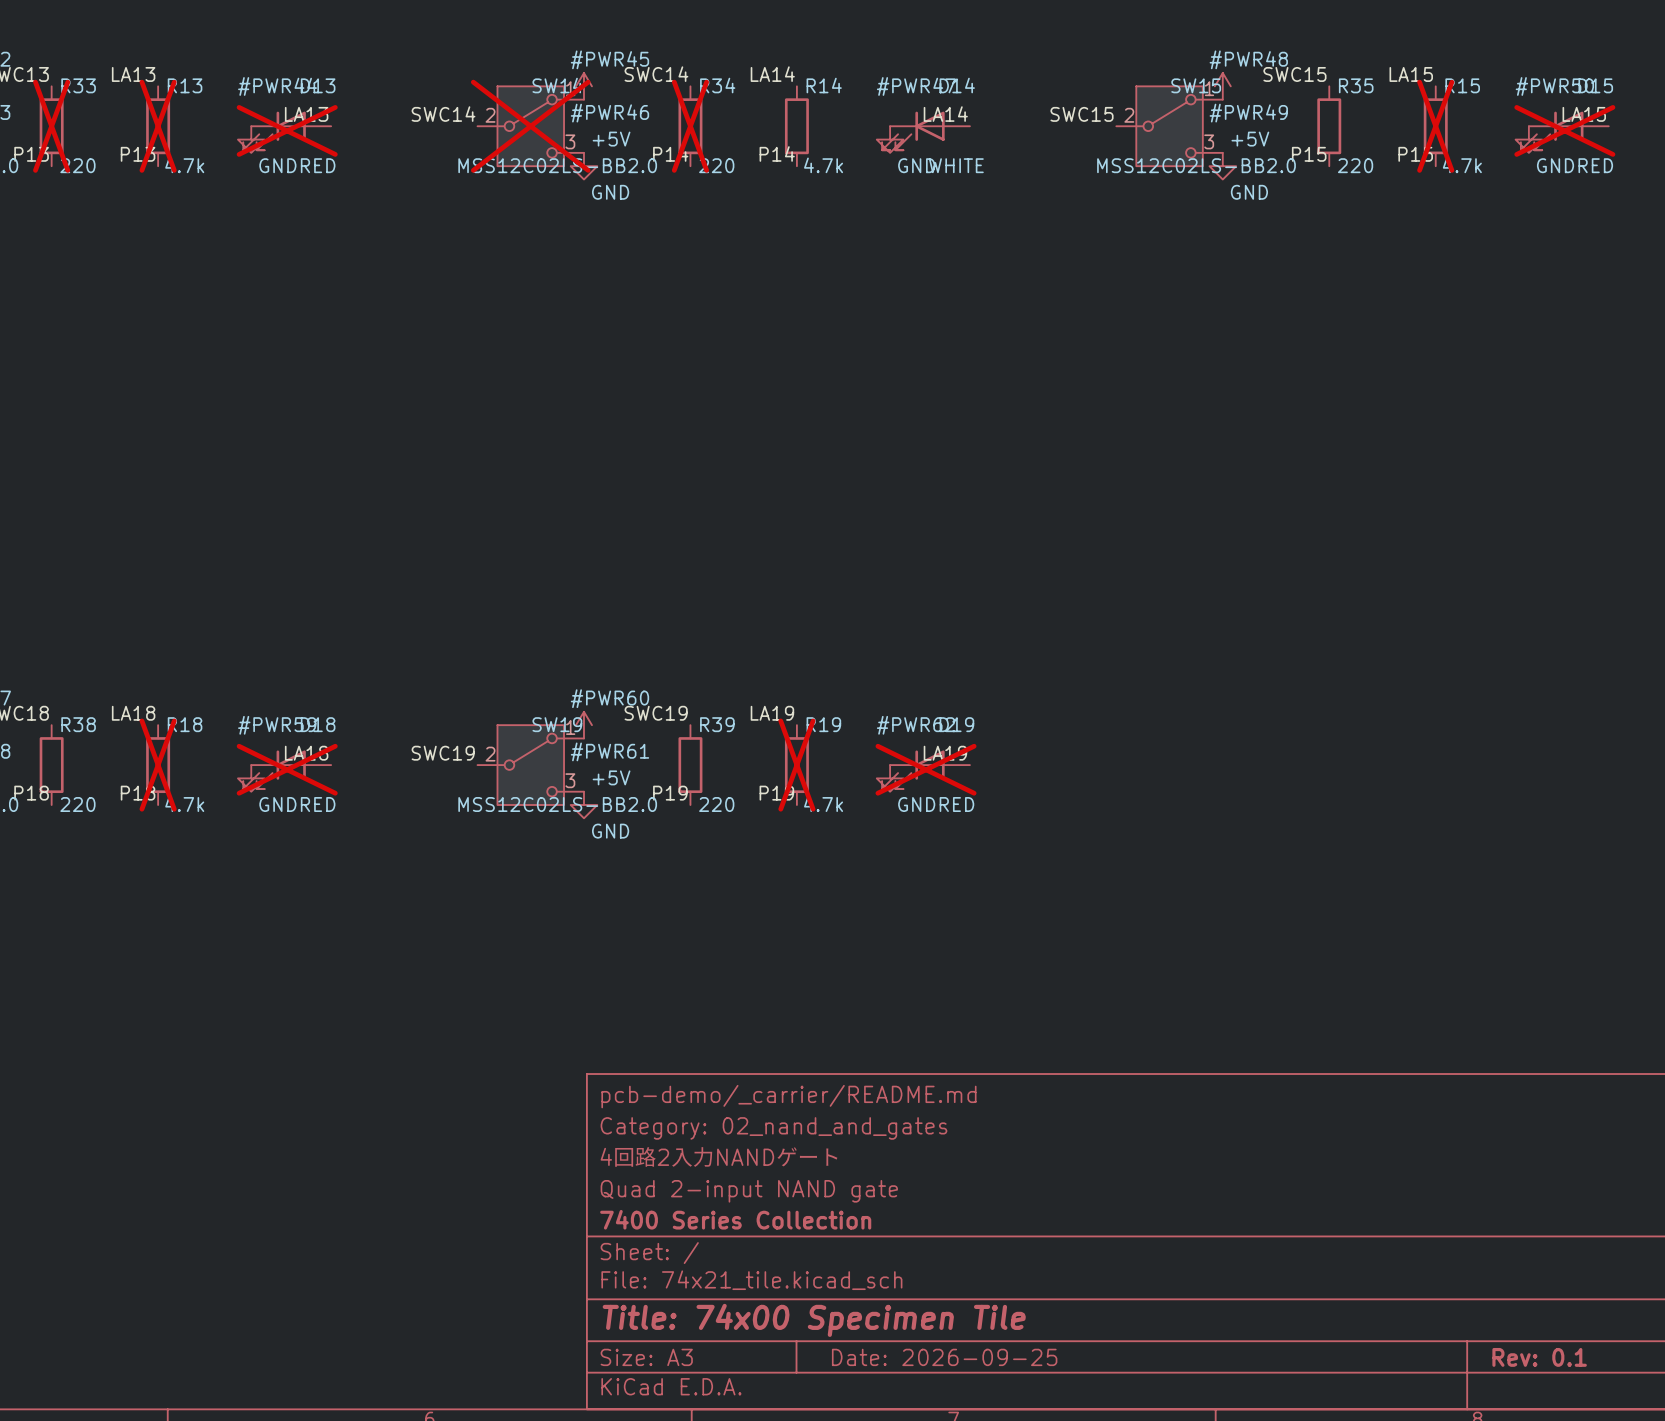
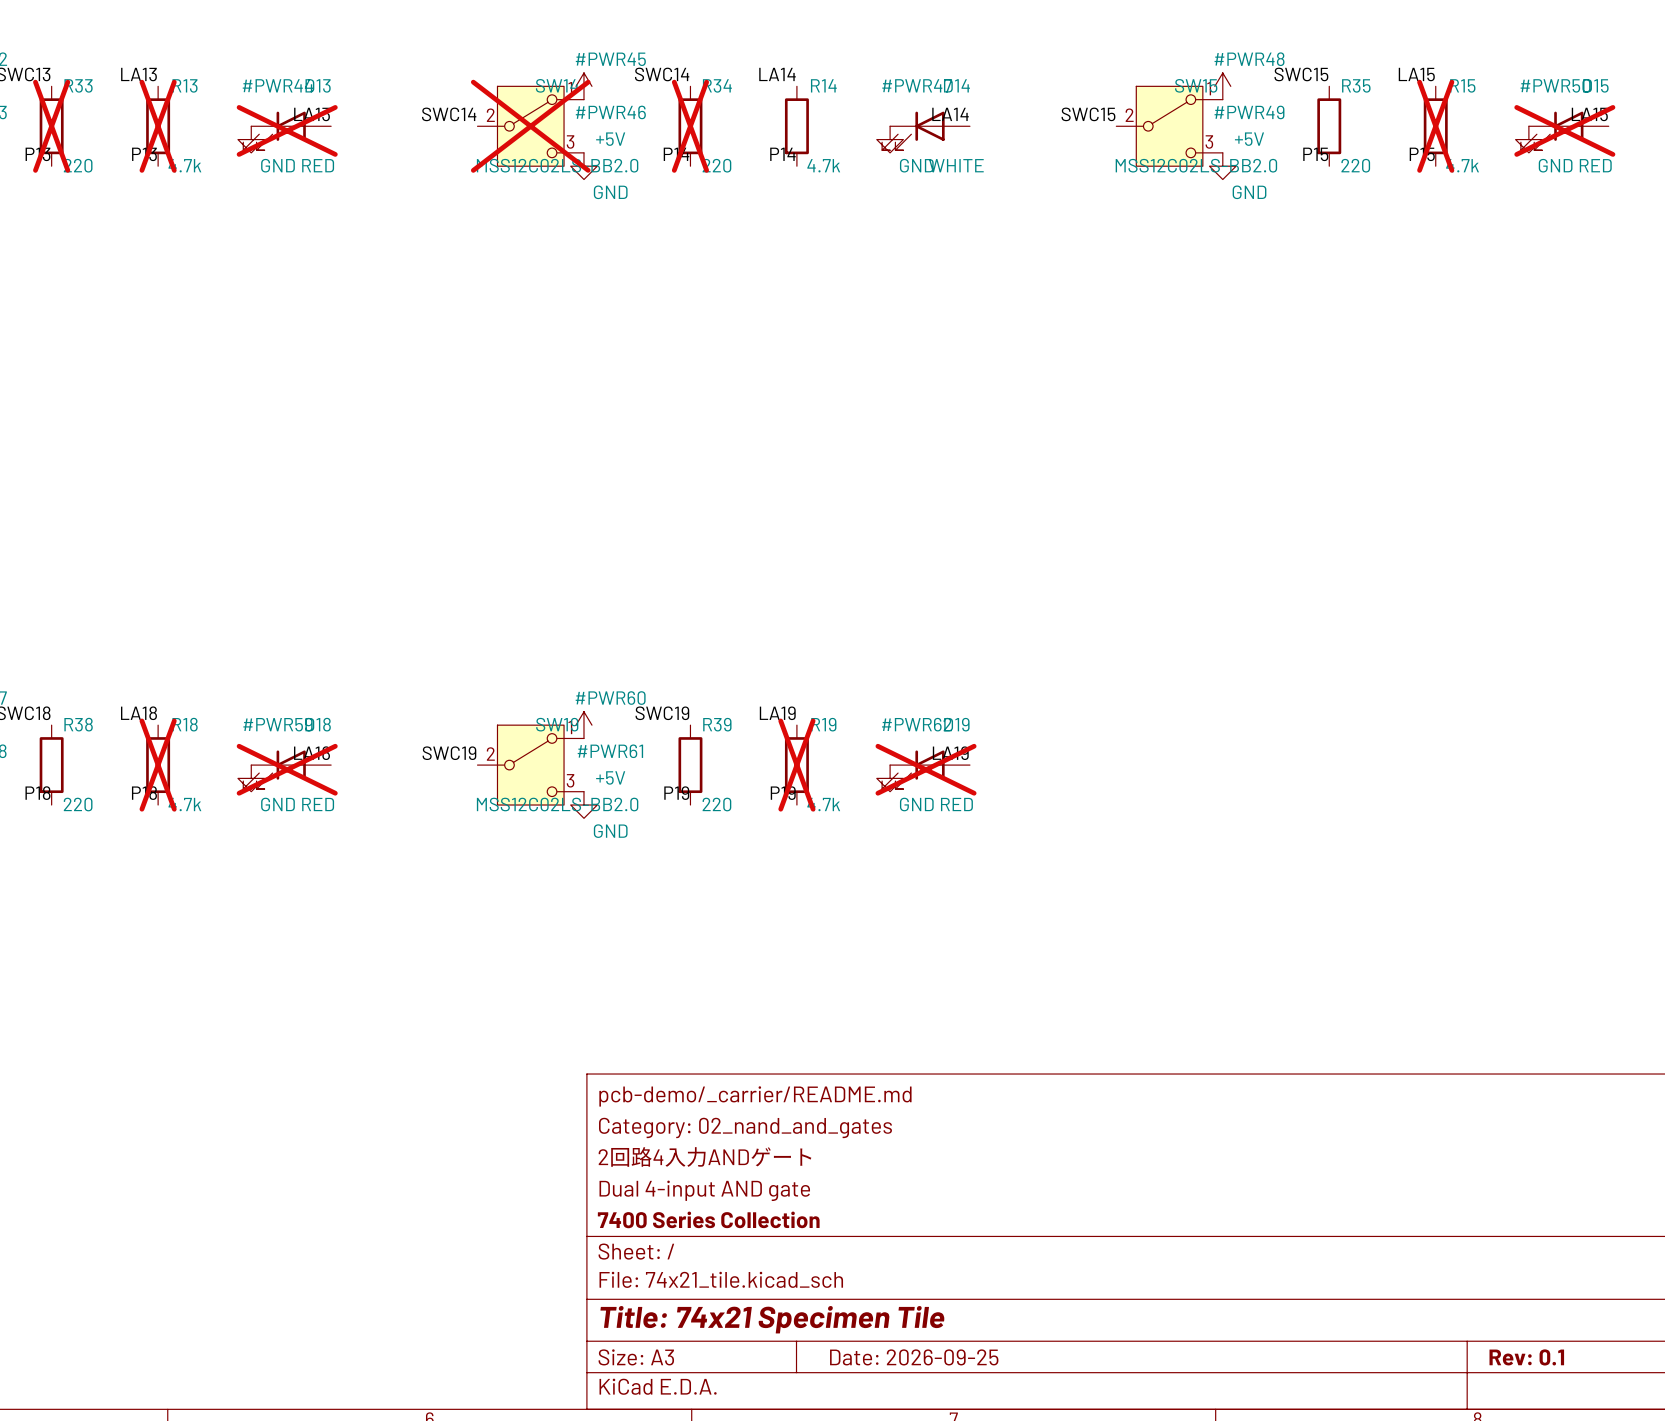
title block: 4回路2入力NANDゲート (719, 1157) -> 2回路4入力ANDゲート (705, 1157)
title block: Quad 2-input NAND gate (749, 1191) -> Dual 4-input AND gate (704, 1190)
title block: Title: 74x00 Specimen Tile (814, 1320) -> Title: 74x21 Specimen Tile (772, 1319)

